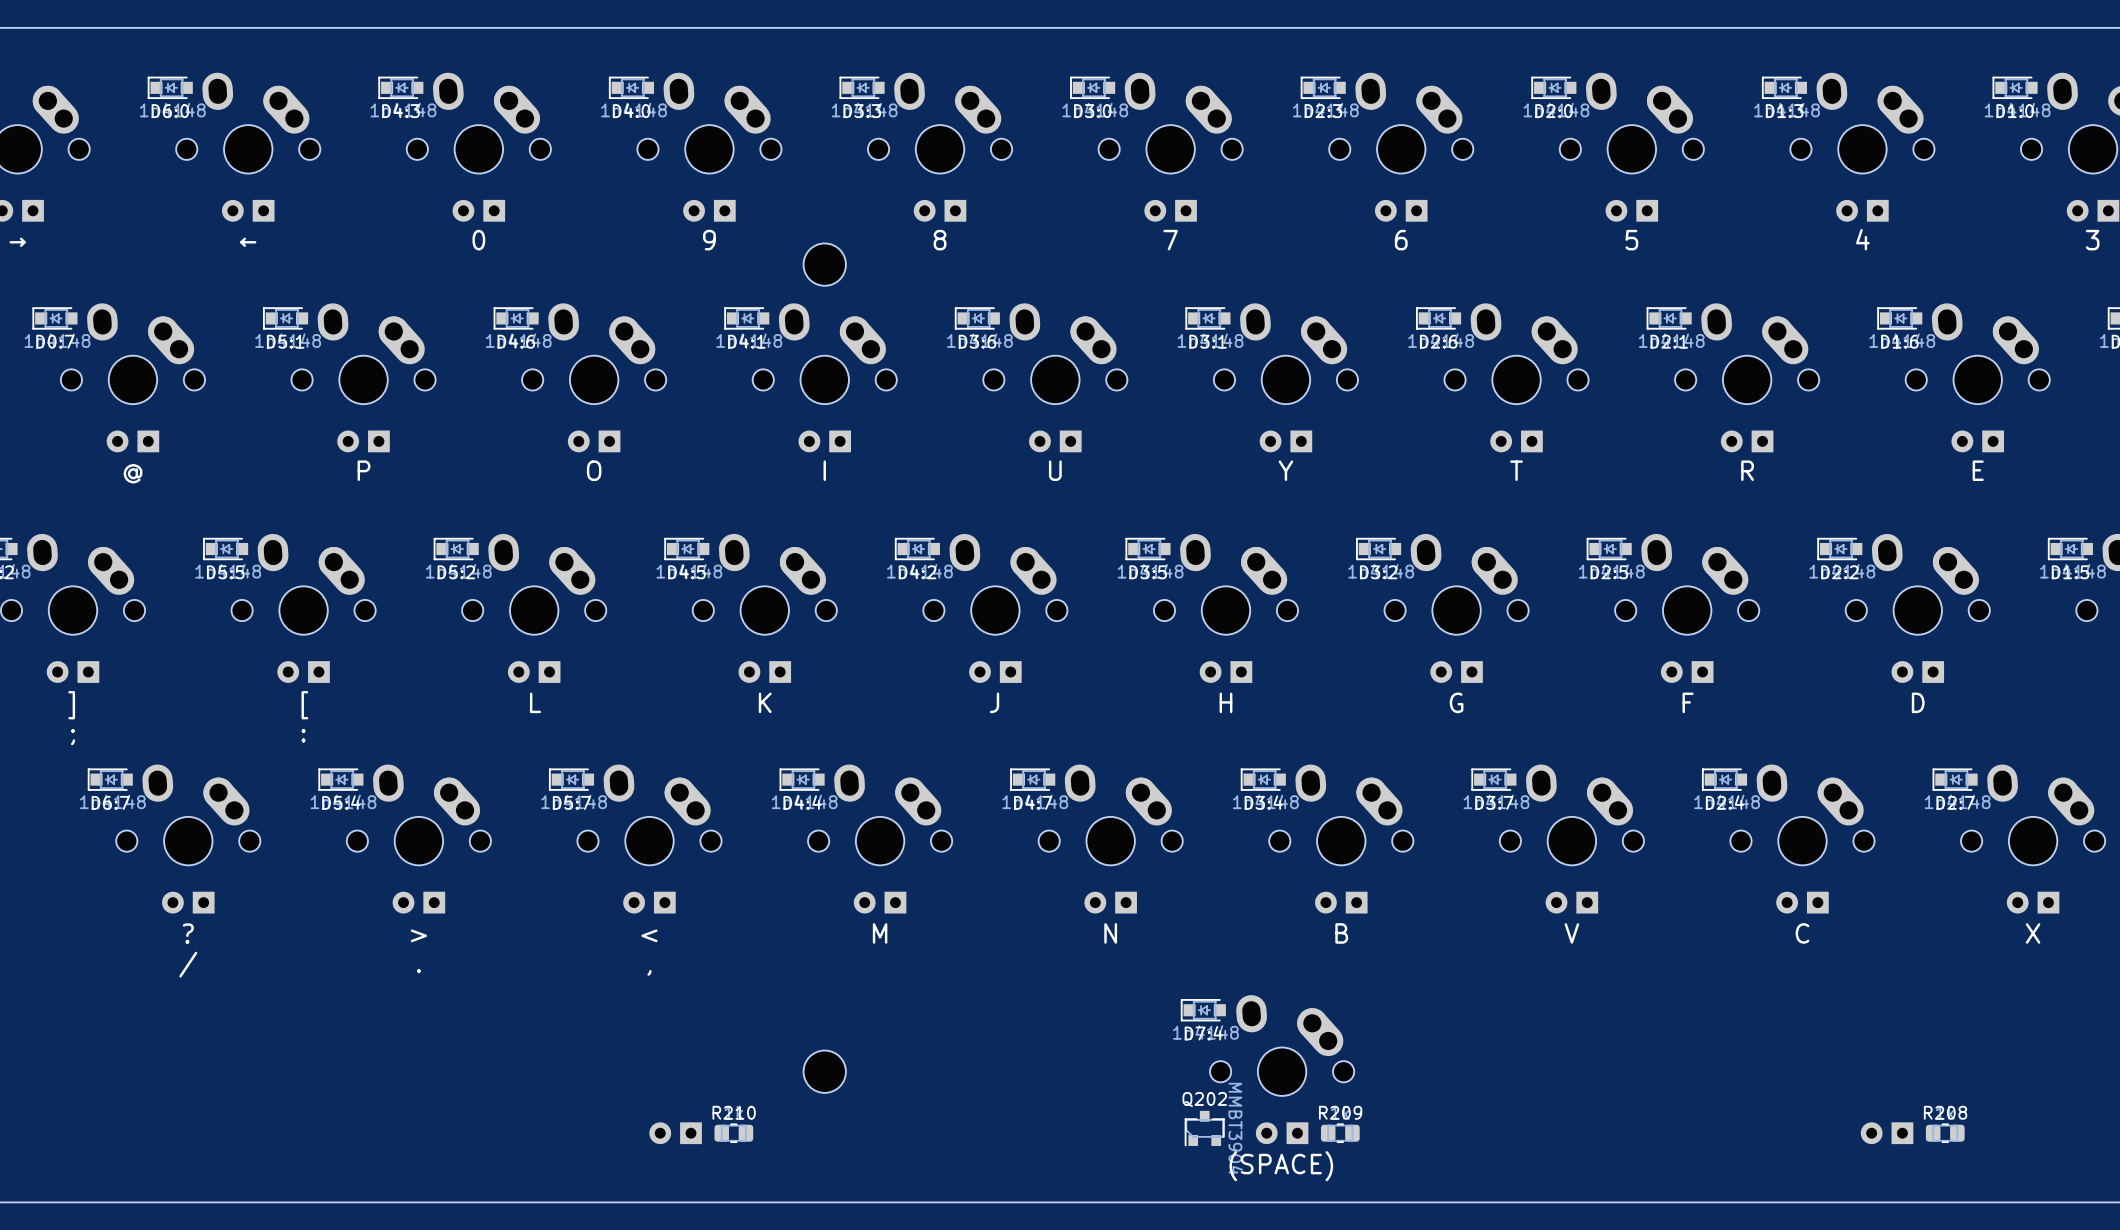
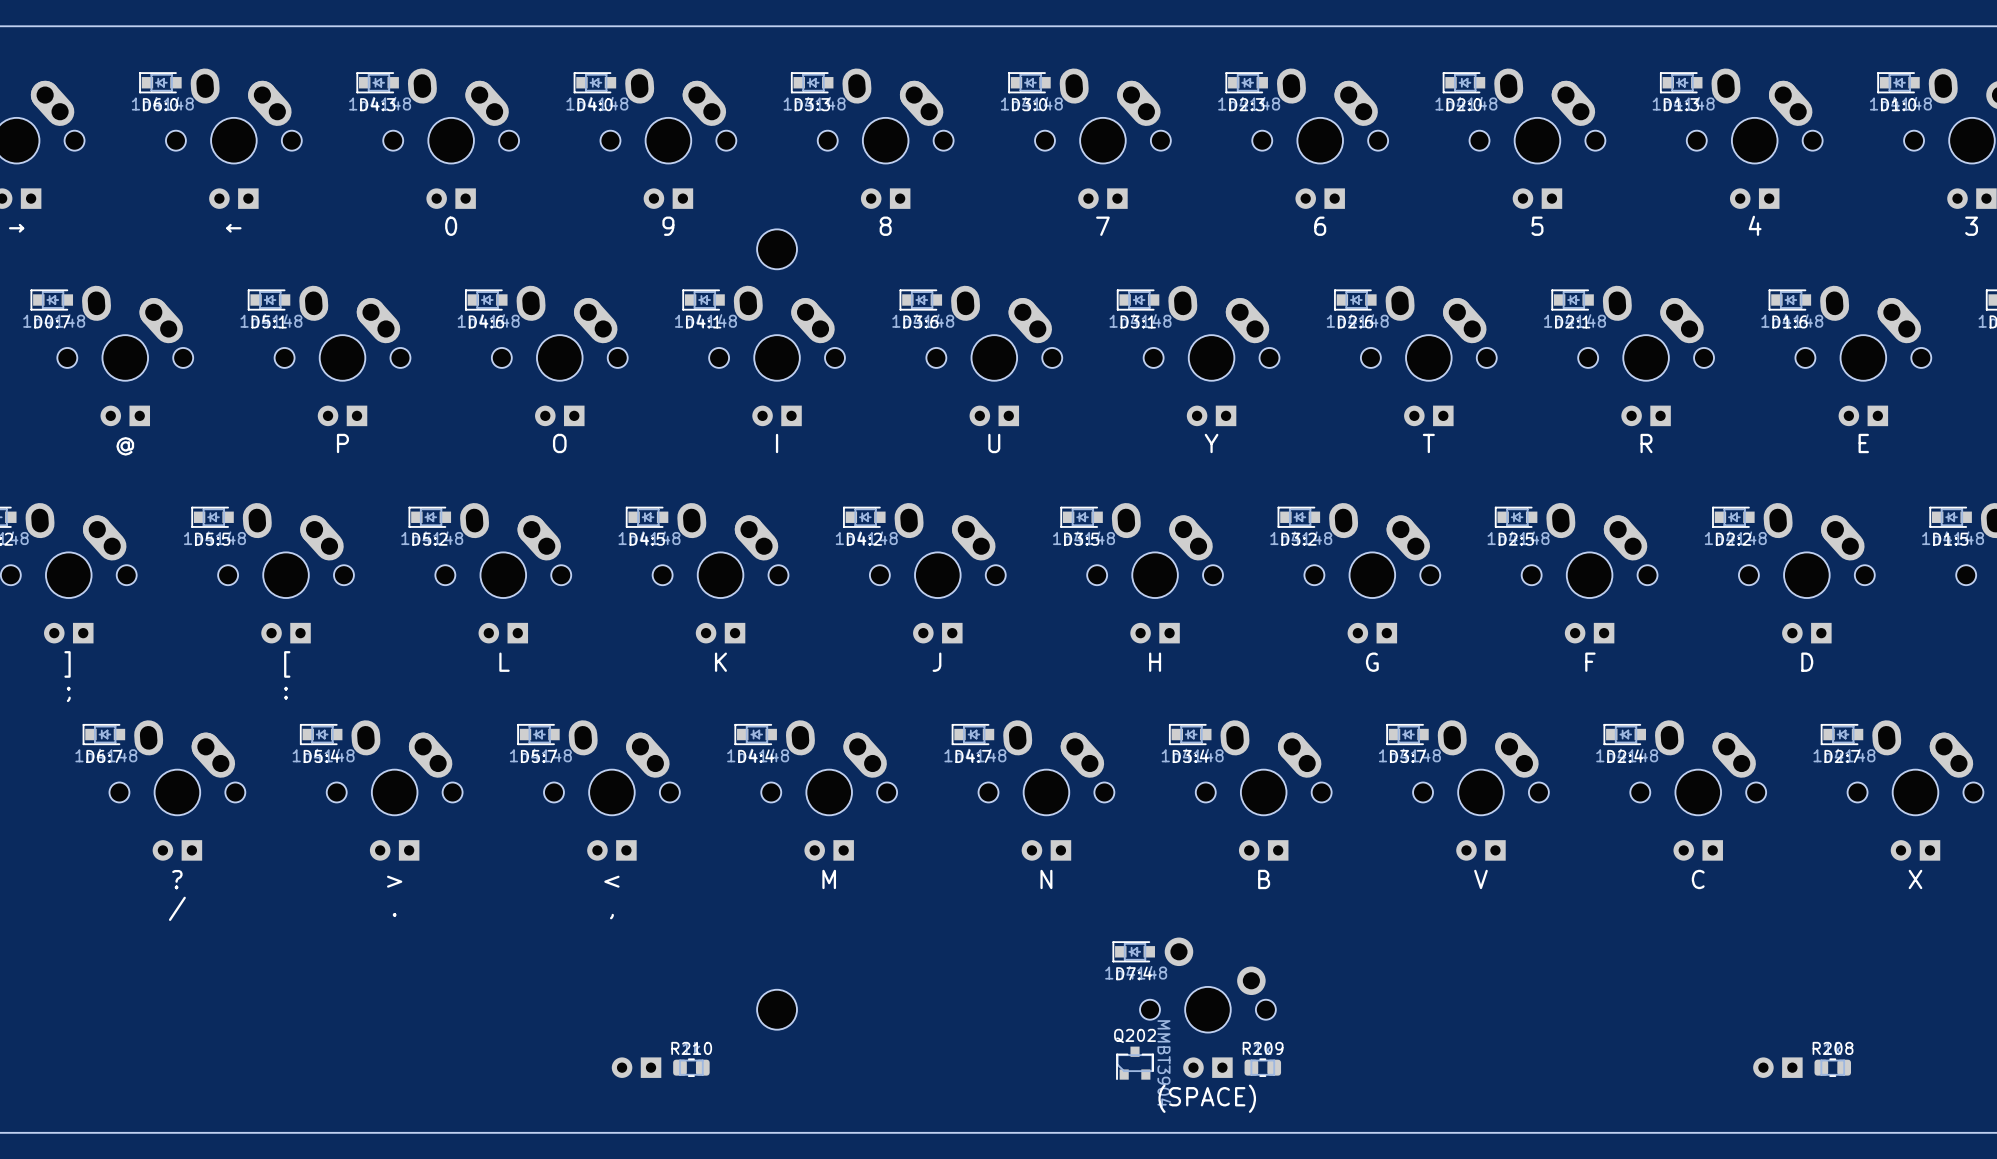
part footprint: [1210, 995, 1355, 1096] -> [1140, 937, 1276, 1033]

